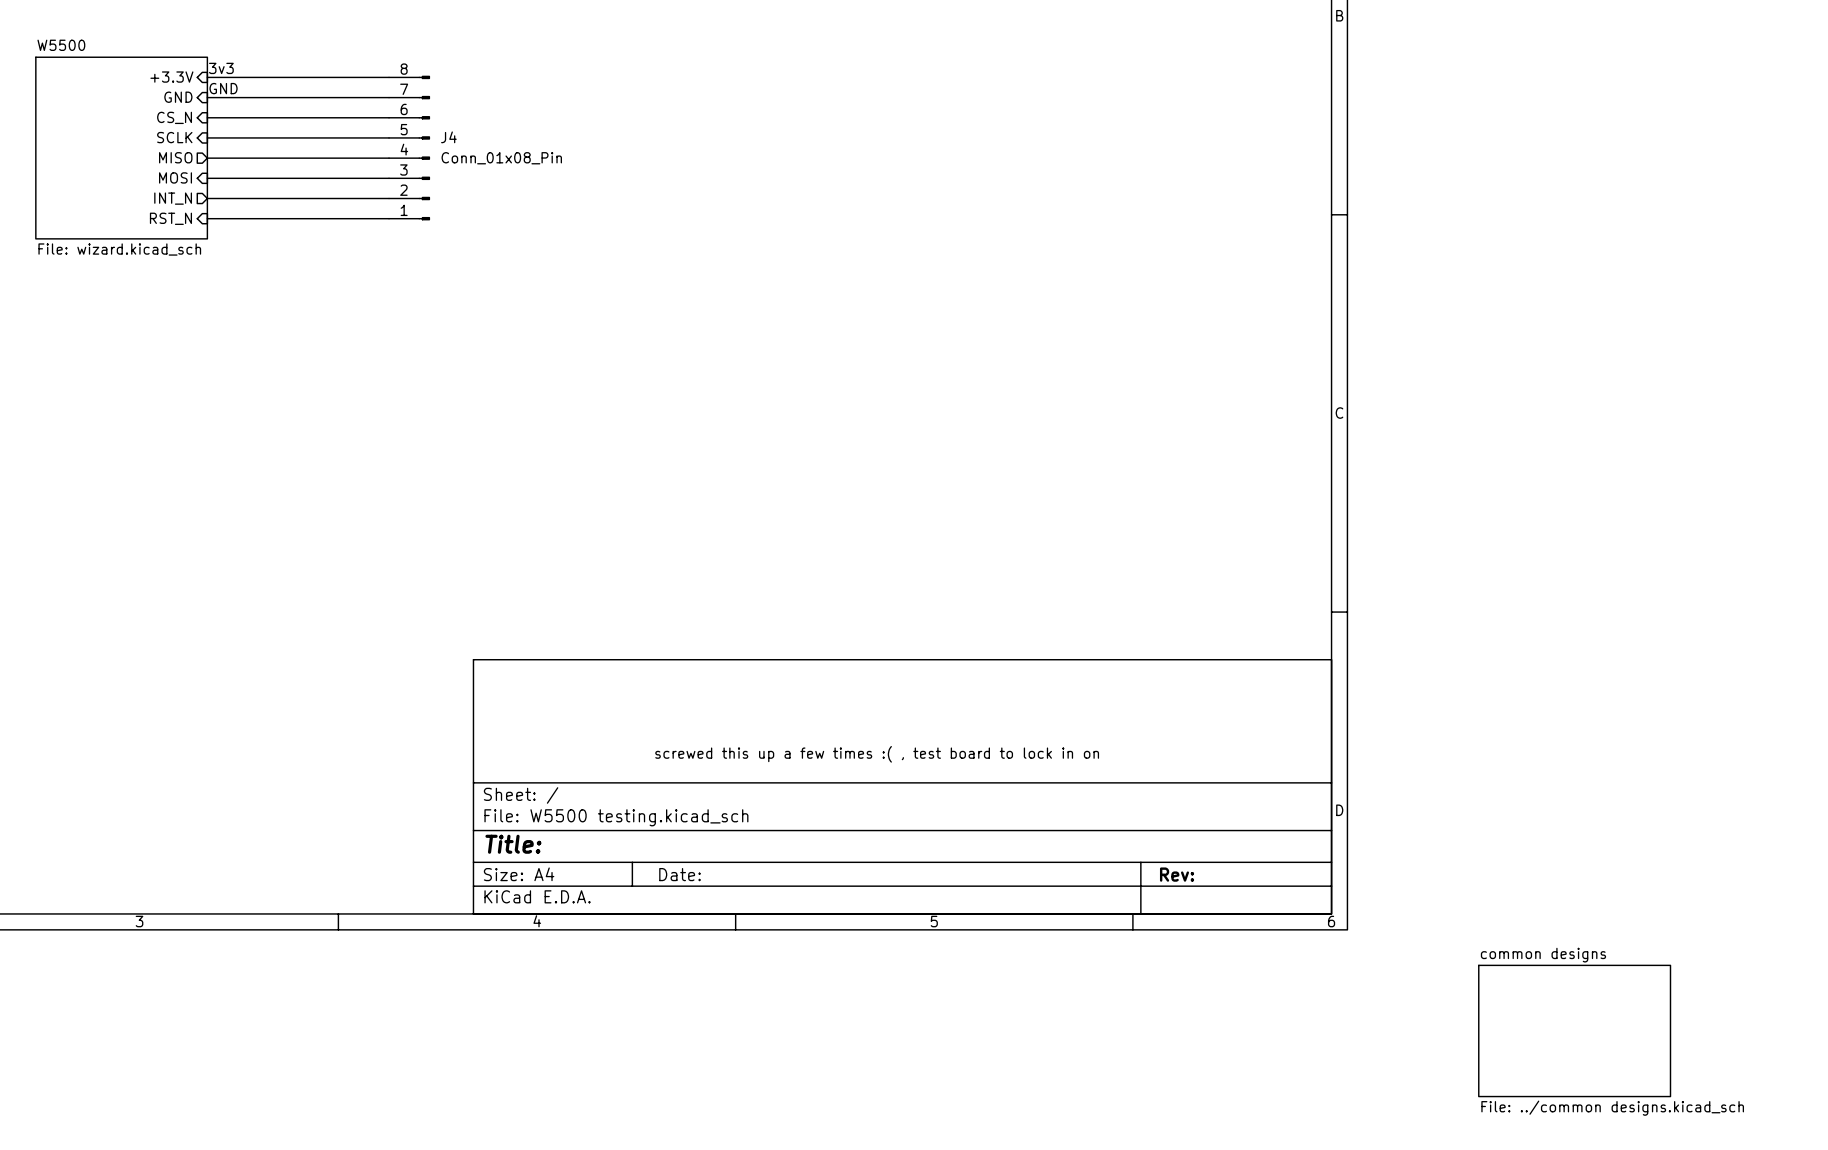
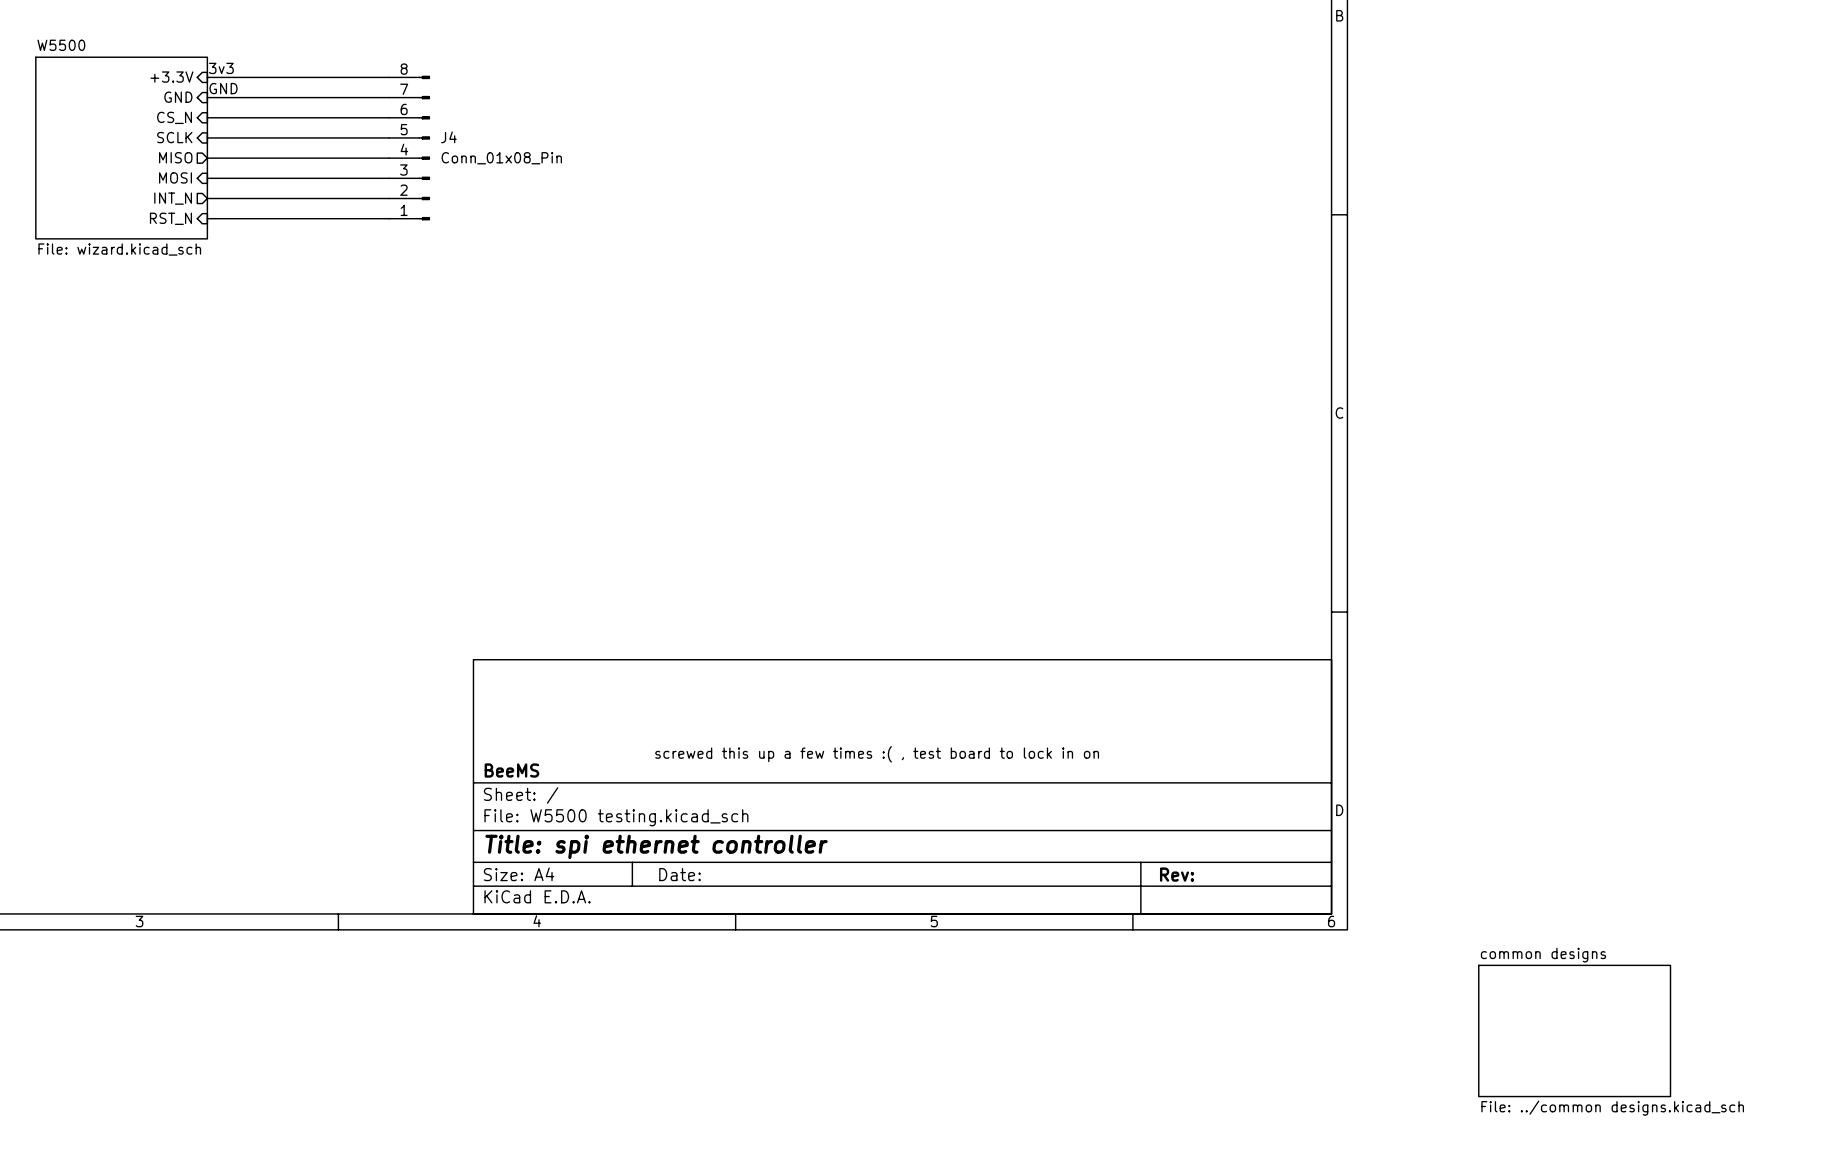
title block: none -> BeeMS (511, 770)
title block: Title: (513, 844) -> Title: spi ethernet controller (656, 846)

